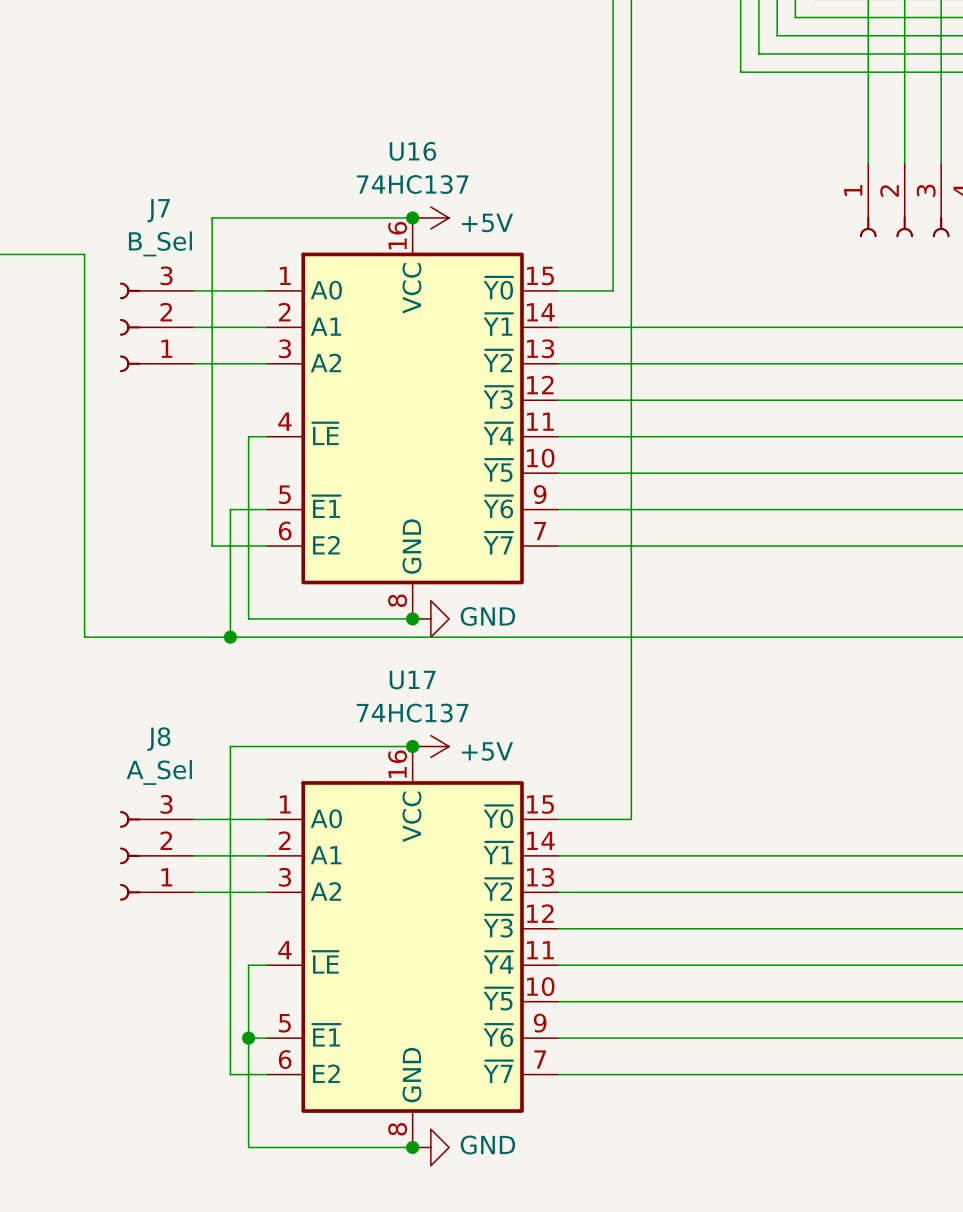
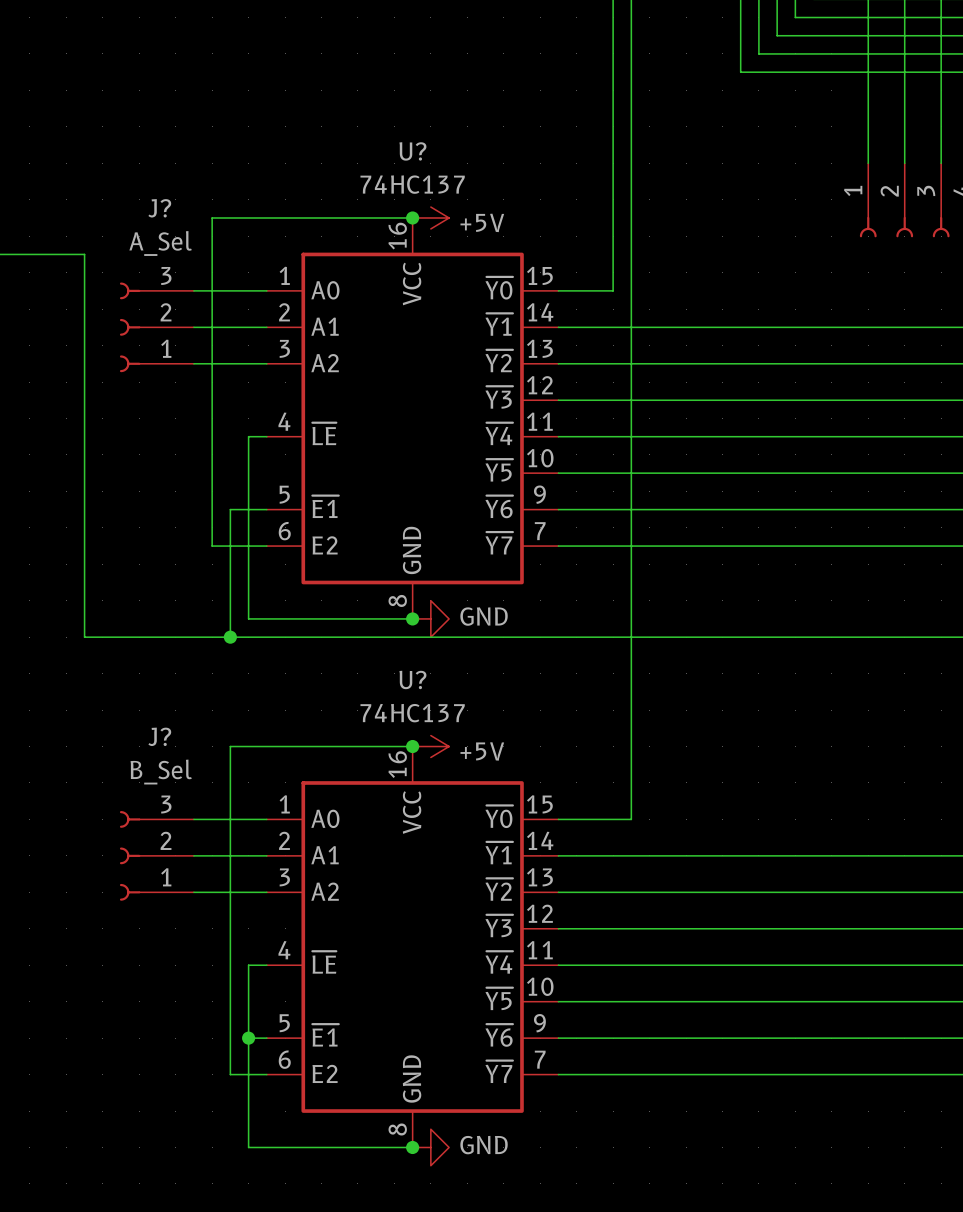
U16 name: U16 (412, 151) -> U? (412, 151)
J7 name: J7 (158, 210) -> J? (159, 208)
J7 value: B_Sel (160, 243) -> A_Sel (160, 243)
U17 name: U17 (412, 680) -> U? (412, 679)
J8 name: J8 (158, 739) -> J? (159, 736)
J8 value: A_Sel (159, 772) -> B_Sel (161, 772)

